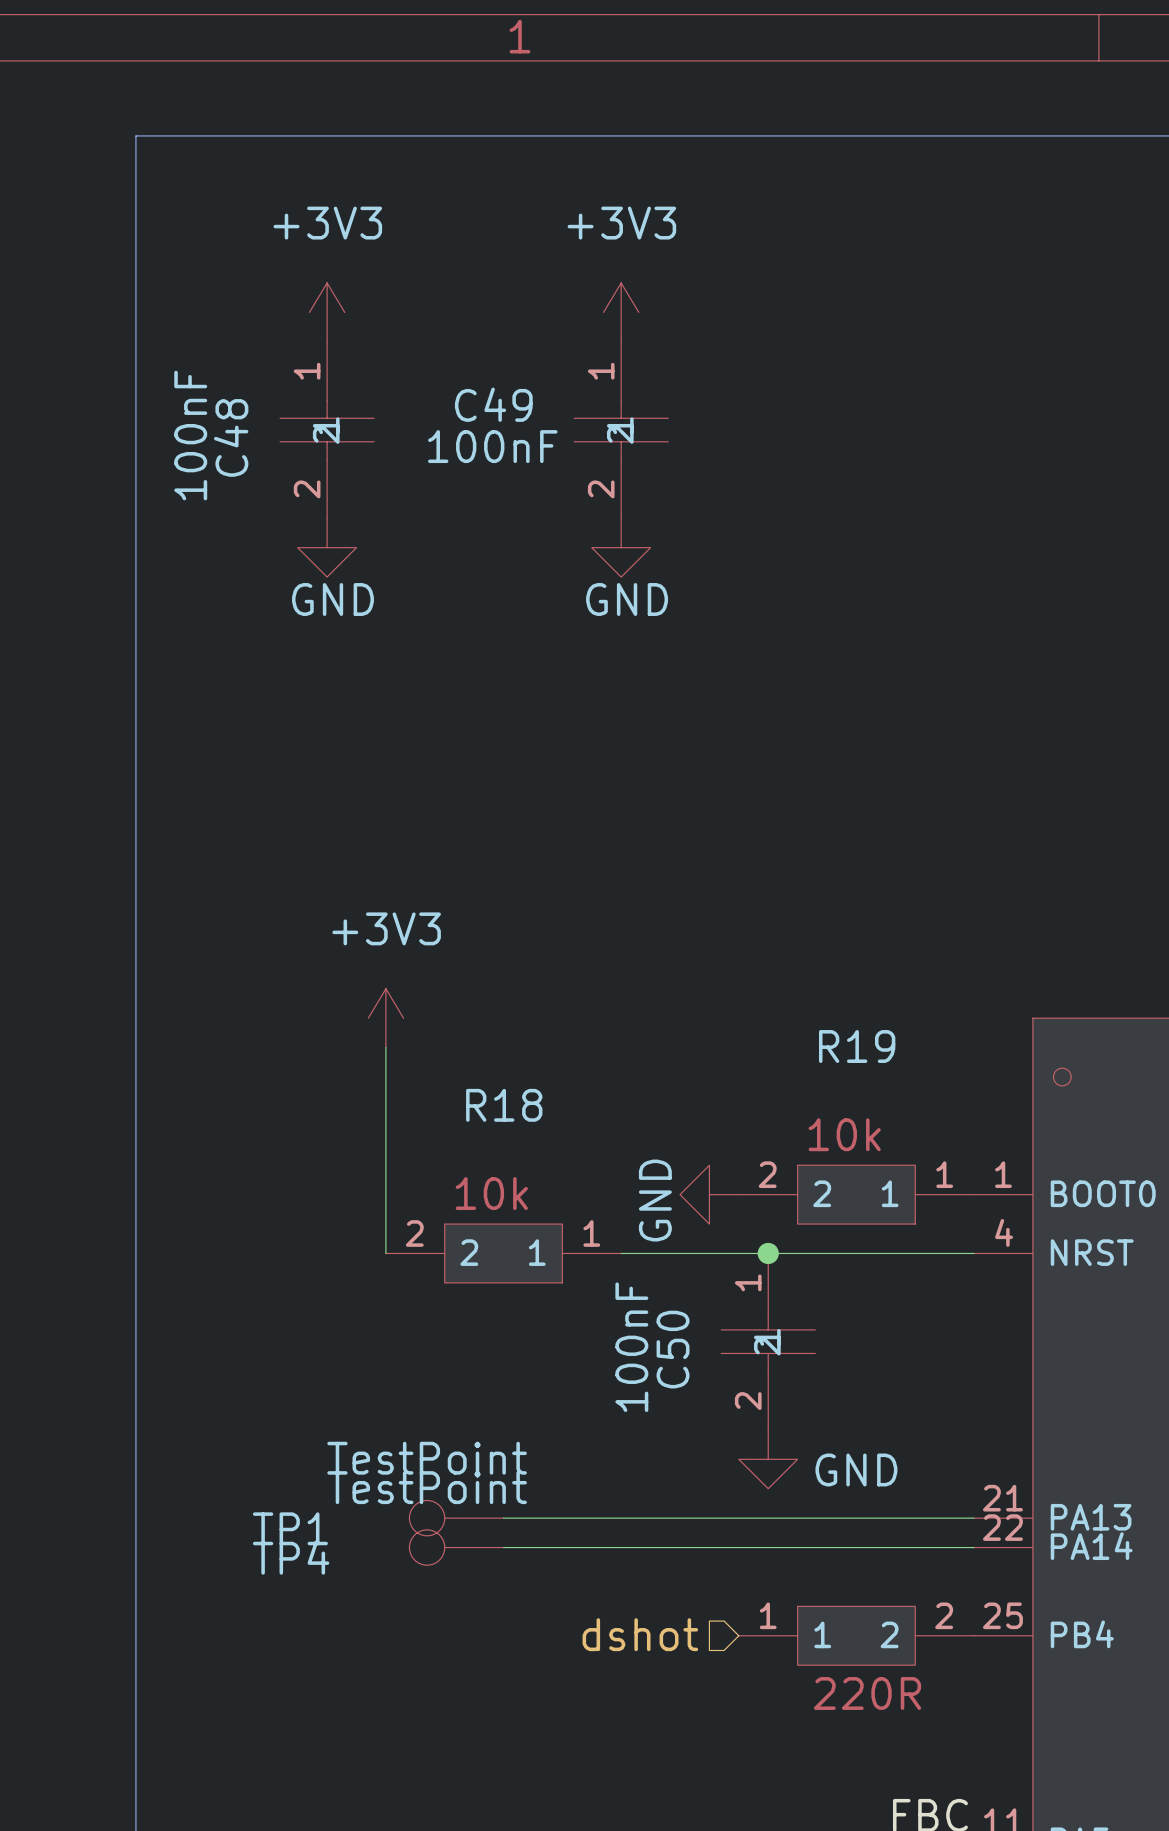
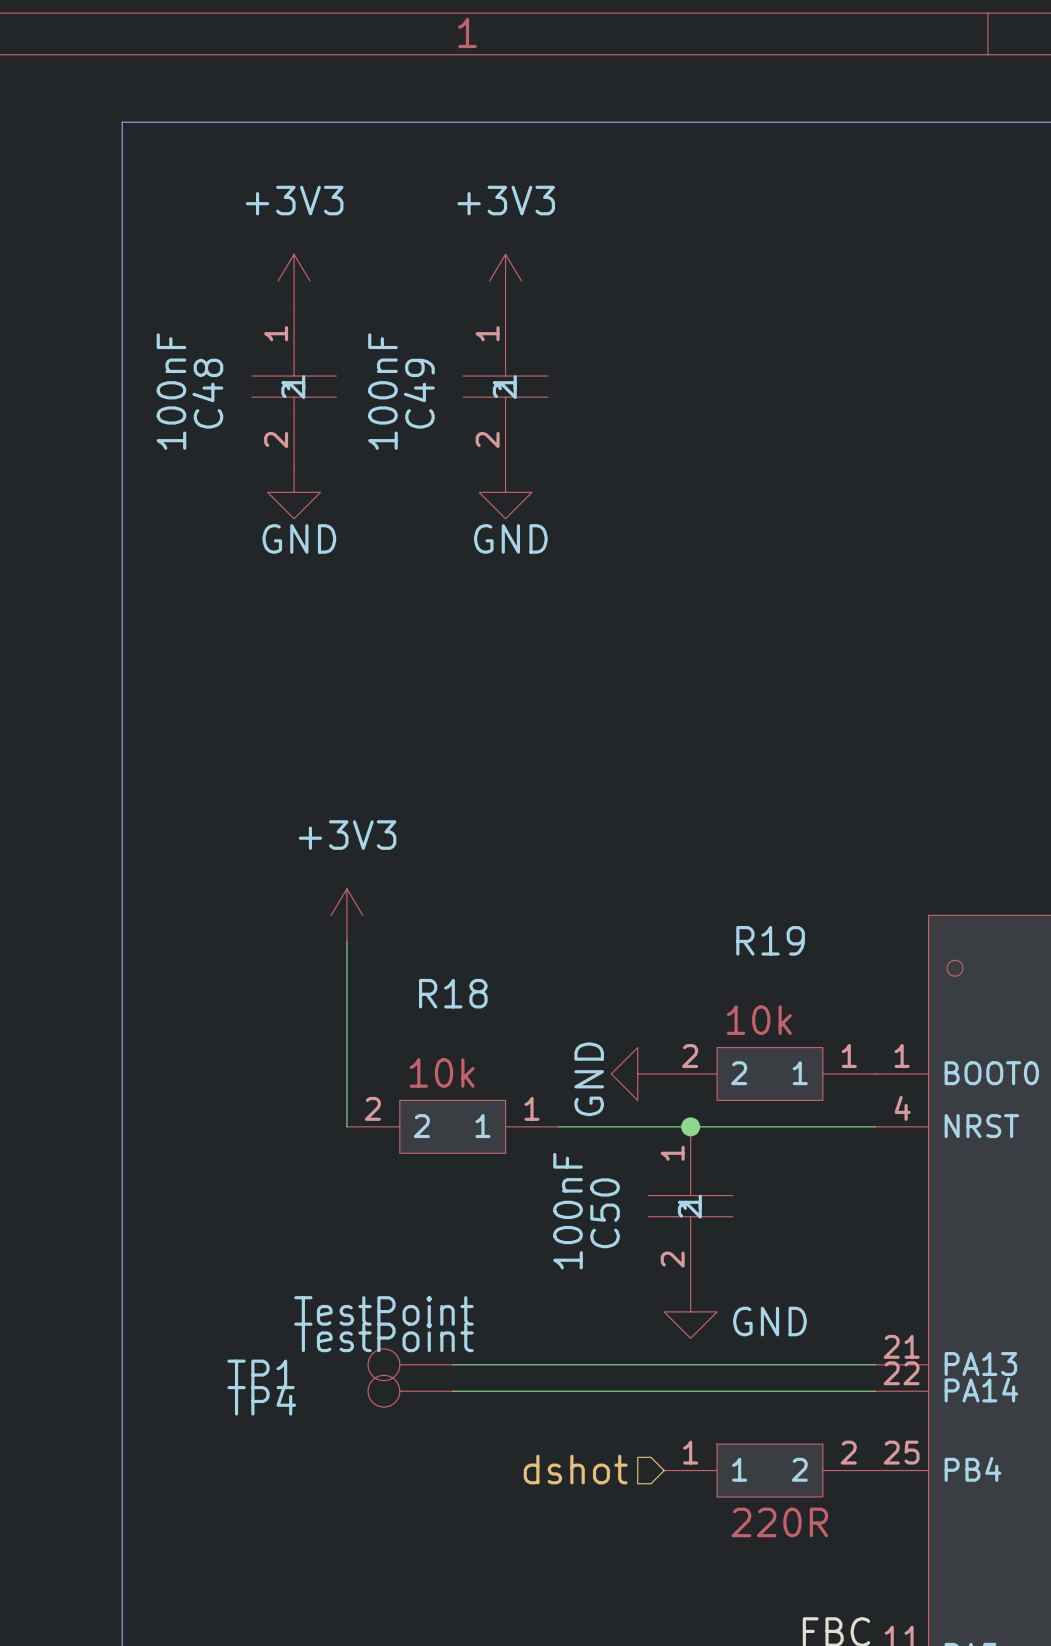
power symbol position: +3V3 (621, 312) -> +3V3 (505, 280)
C49 name rotation: 0° (493, 404) -> 90° counterclockwise (419, 393)
C49 position: (621, 430) -> (505, 386)
C49 value rotation: 0° (492, 446) -> 90° counterclockwise (382, 391)
power symbol position: GND (621, 547) -> GND (505, 492)

